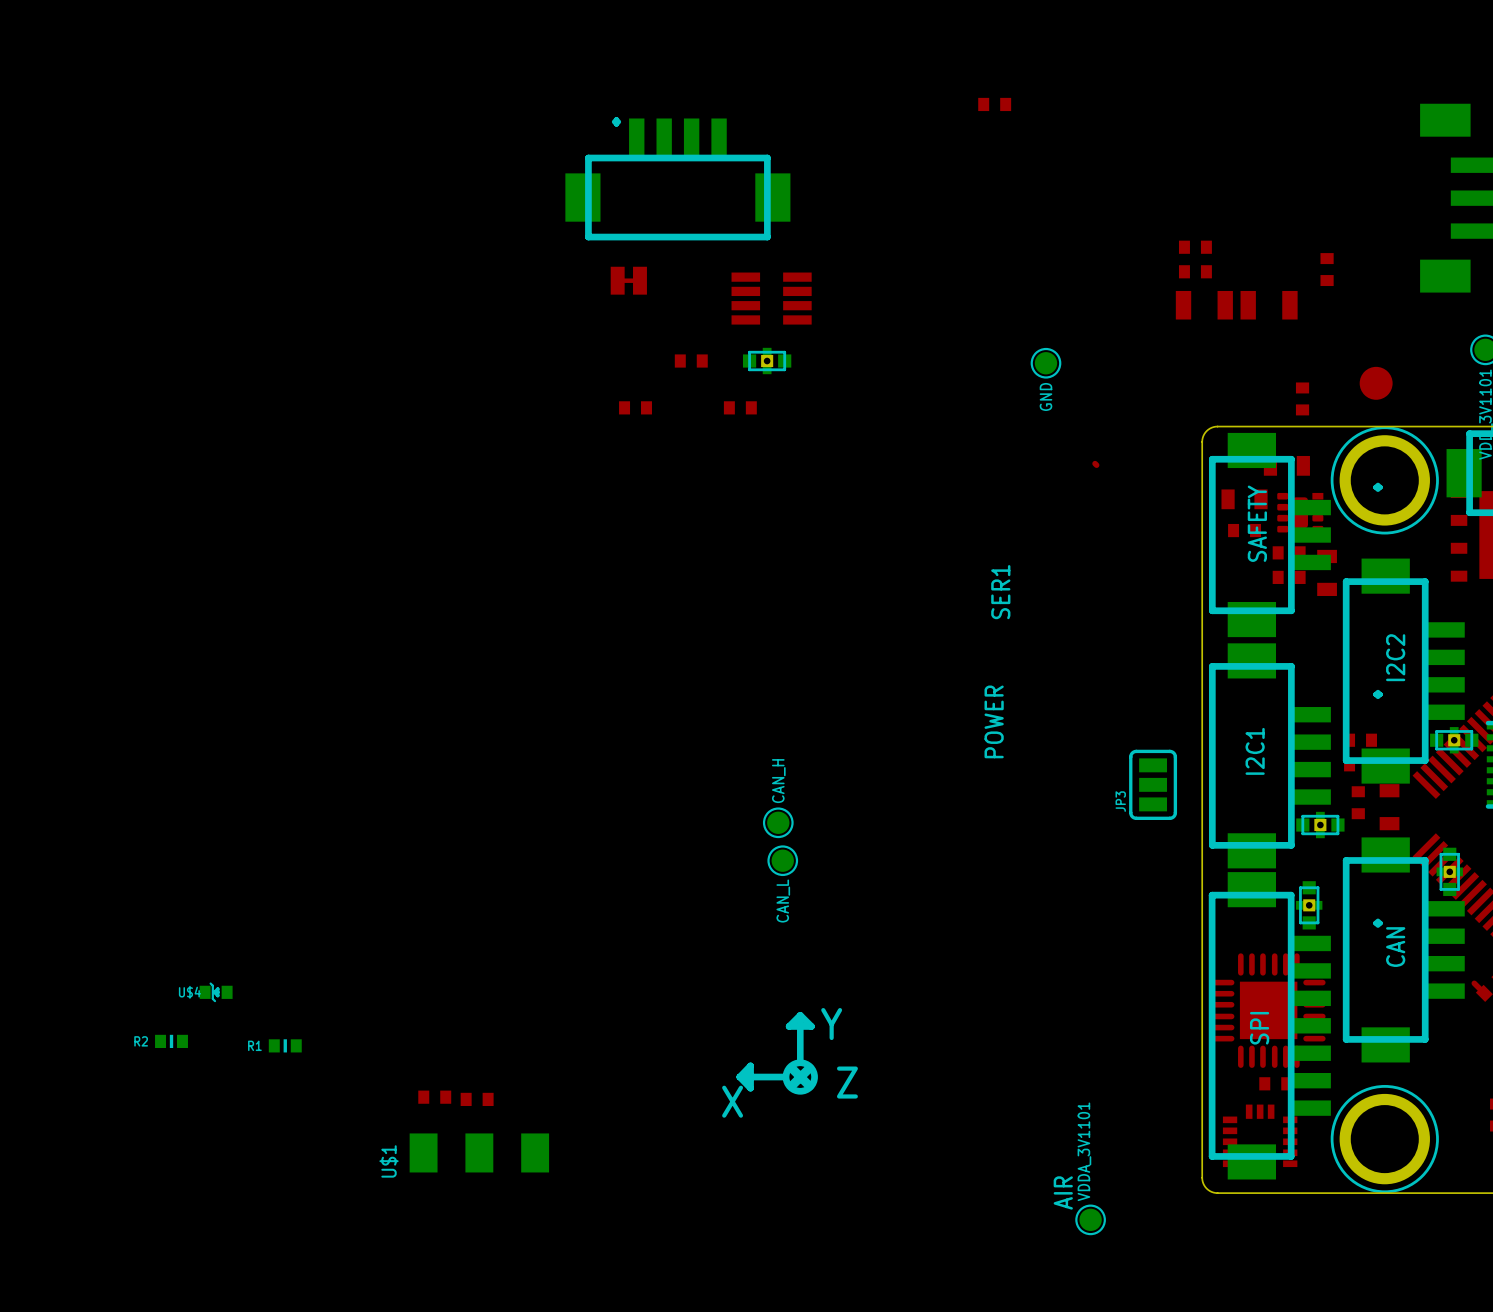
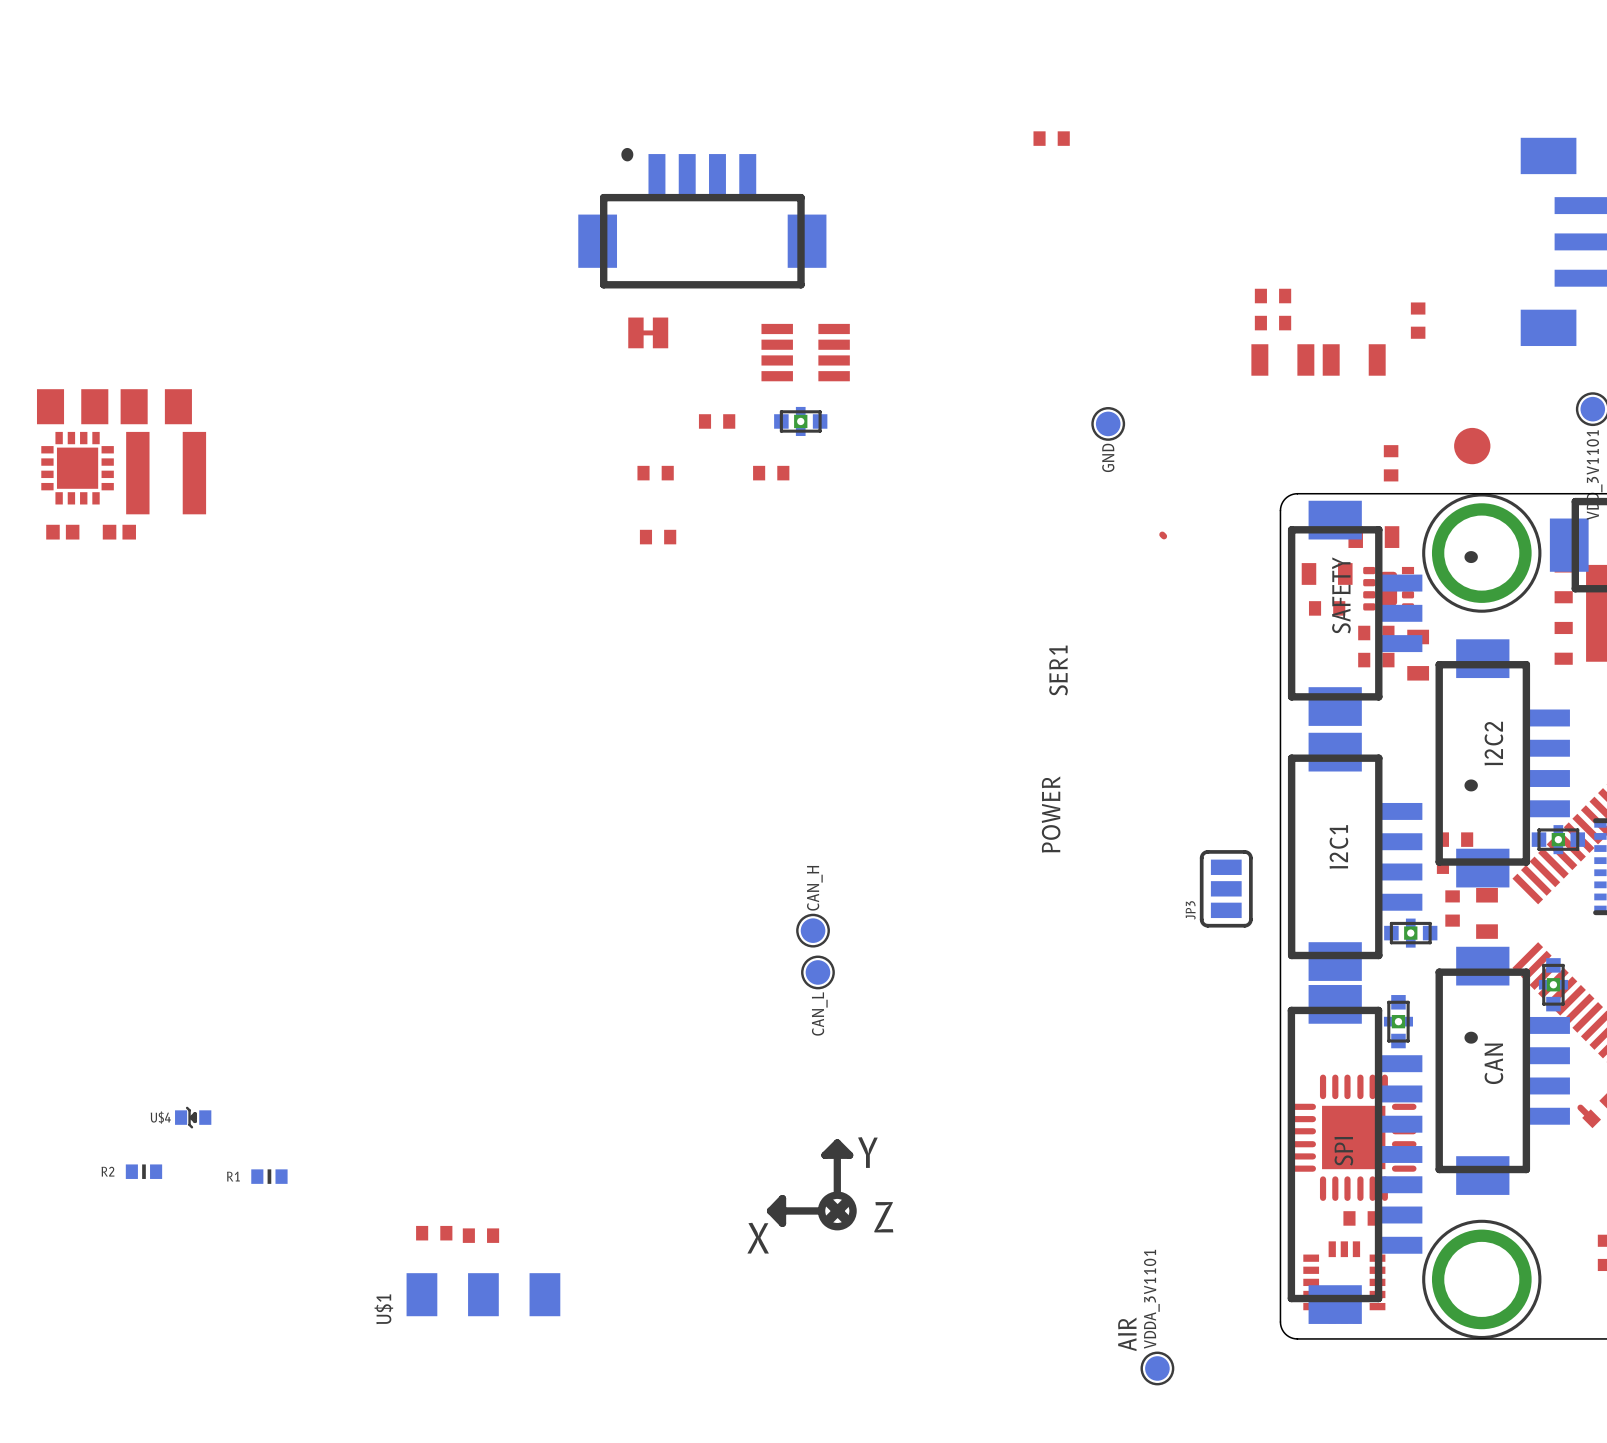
part: none -> (72, 406)
part: none -> (156, 406)
part: none -> (77, 468)
part: none -> (166, 473)
part: none -> (62, 532)
part: none -> (119, 532)
part: none -> (658, 537)

